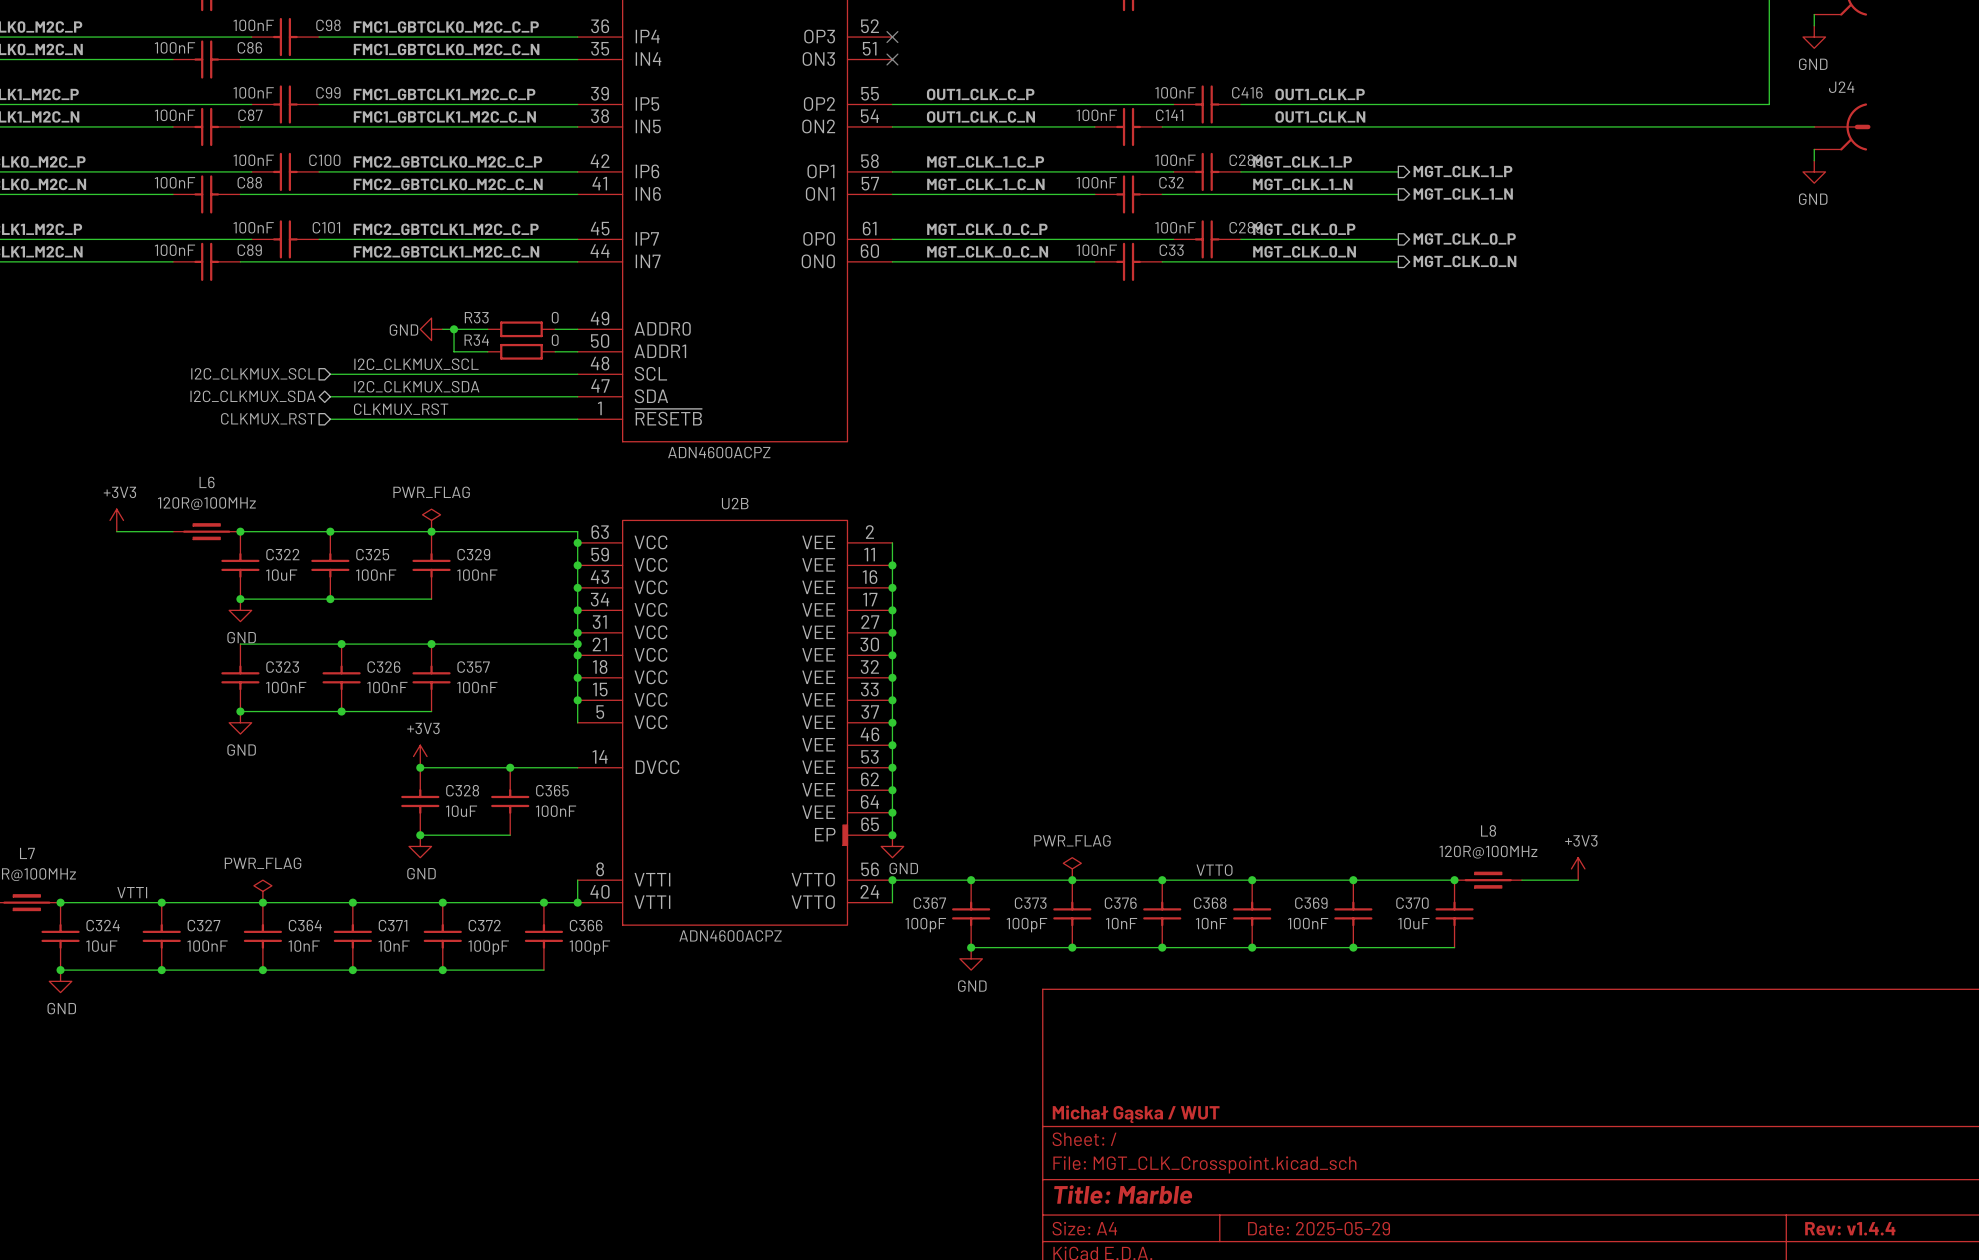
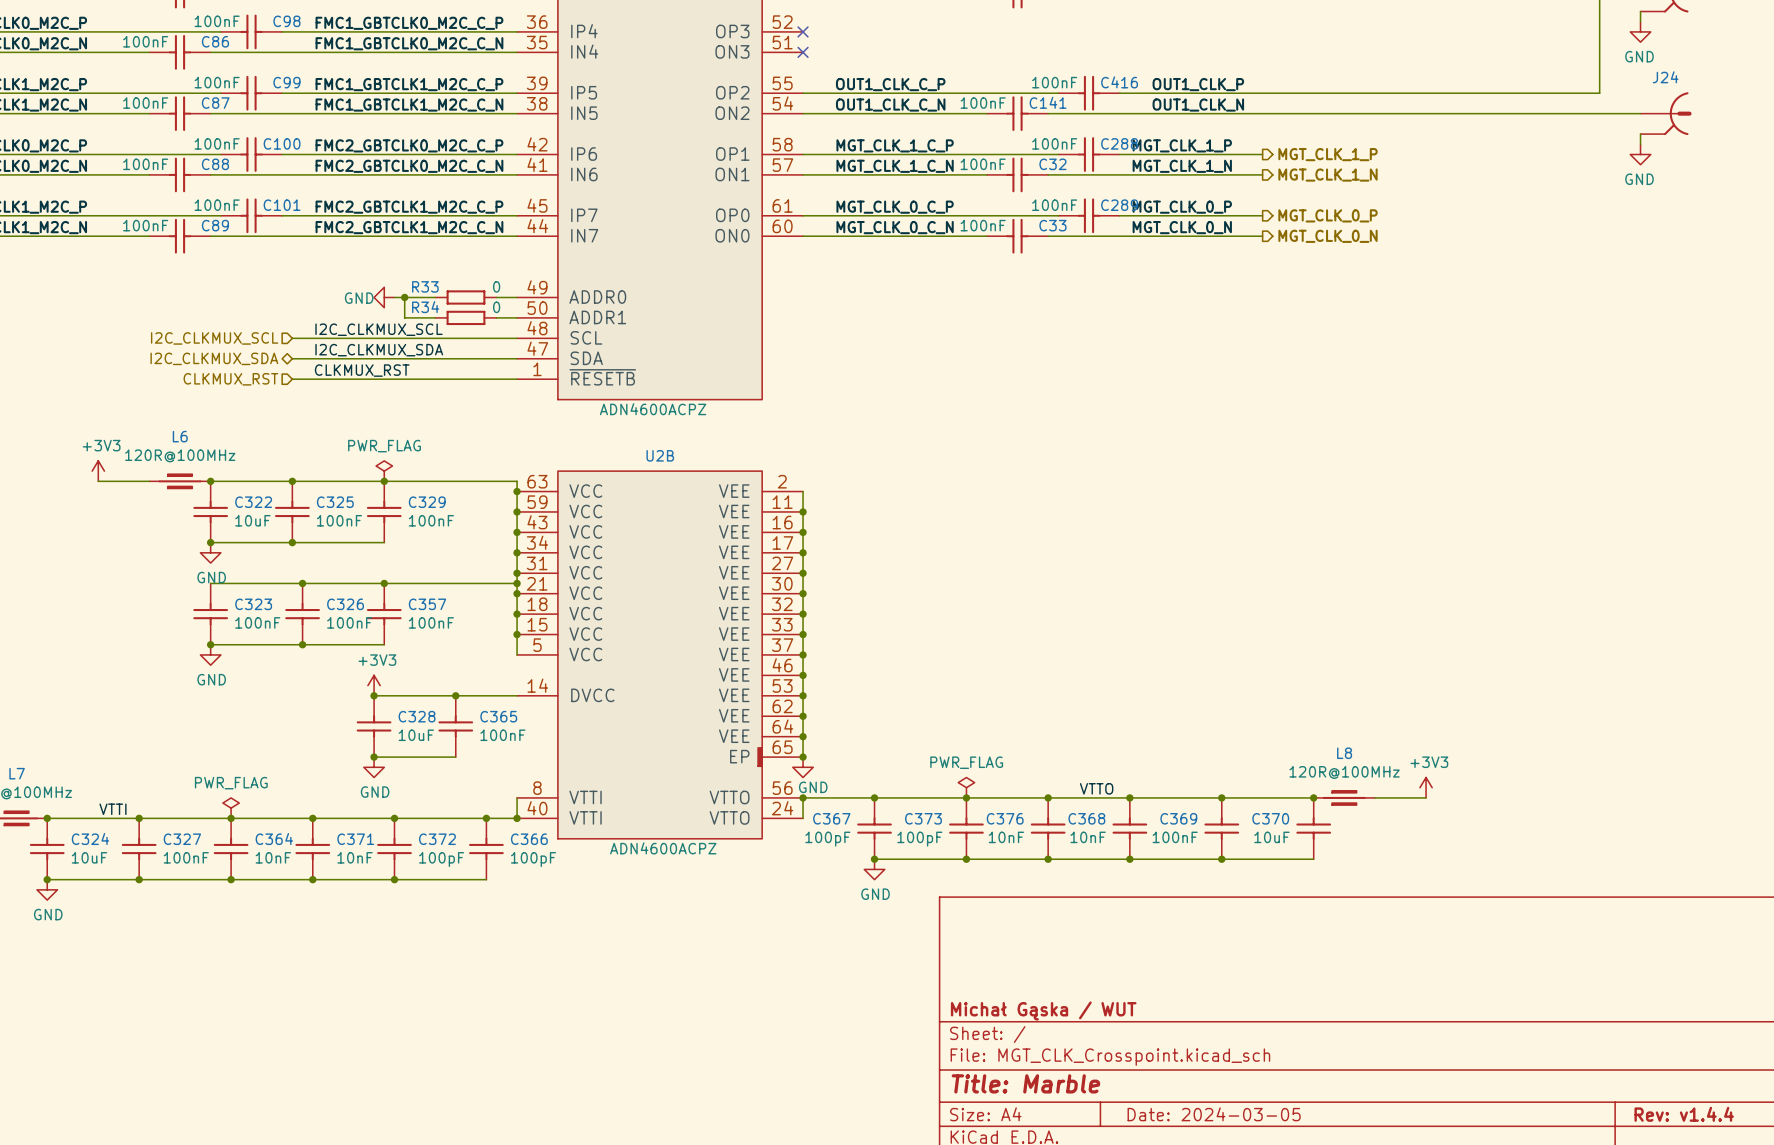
title block: Date: 2025-05-29 (1319, 1228) -> Date: 2024-03-05 (1214, 1114)

